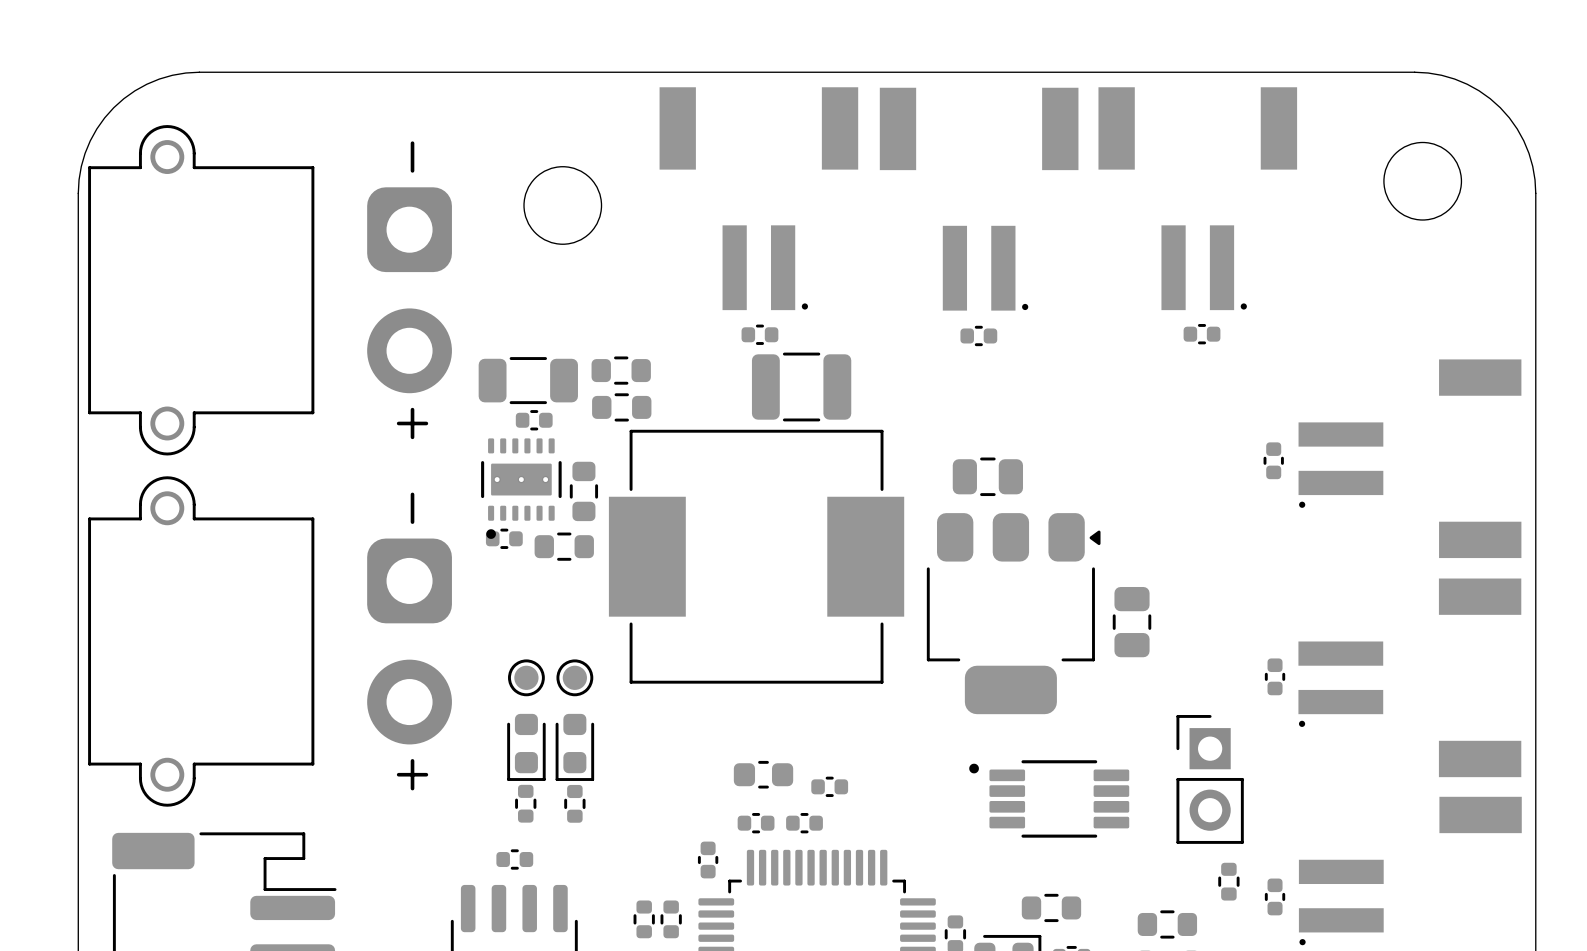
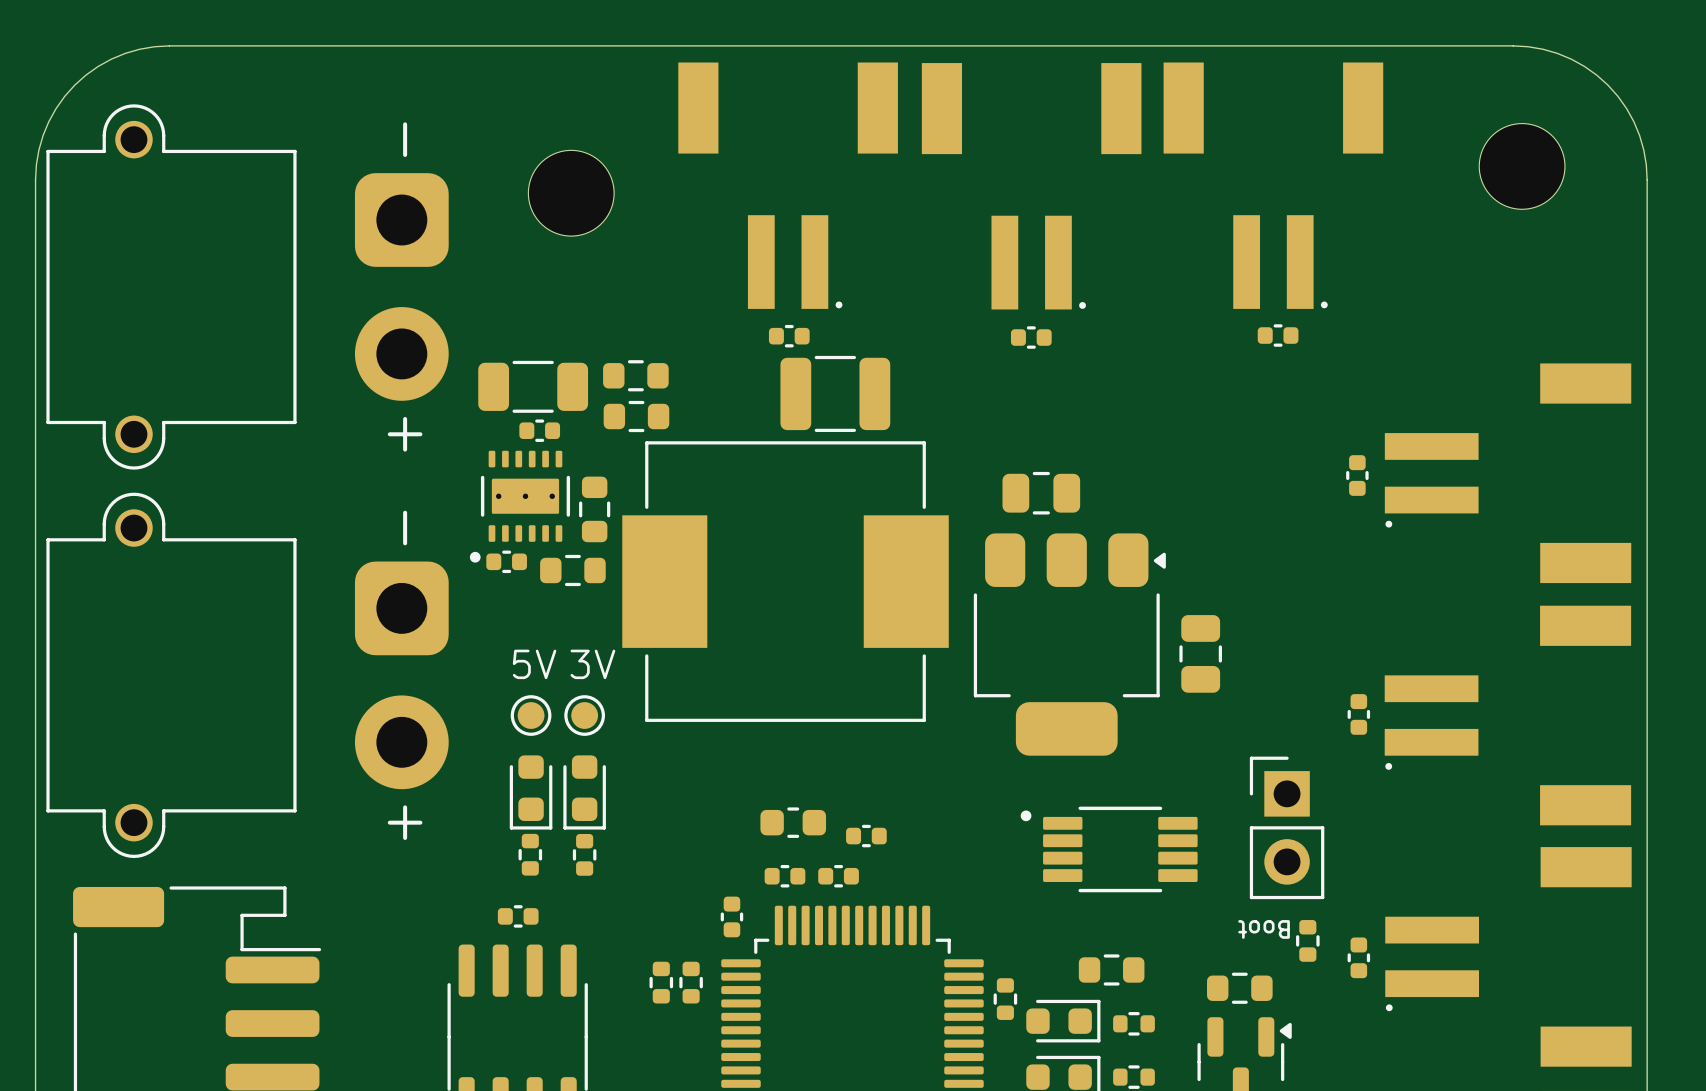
part footprint: [481, 438, 562, 539] -> [469, 450, 571, 563]
text: none -> 5V (534, 664)
text: none -> 3V (592, 664)
text: none -> Boot (1264, 929)

